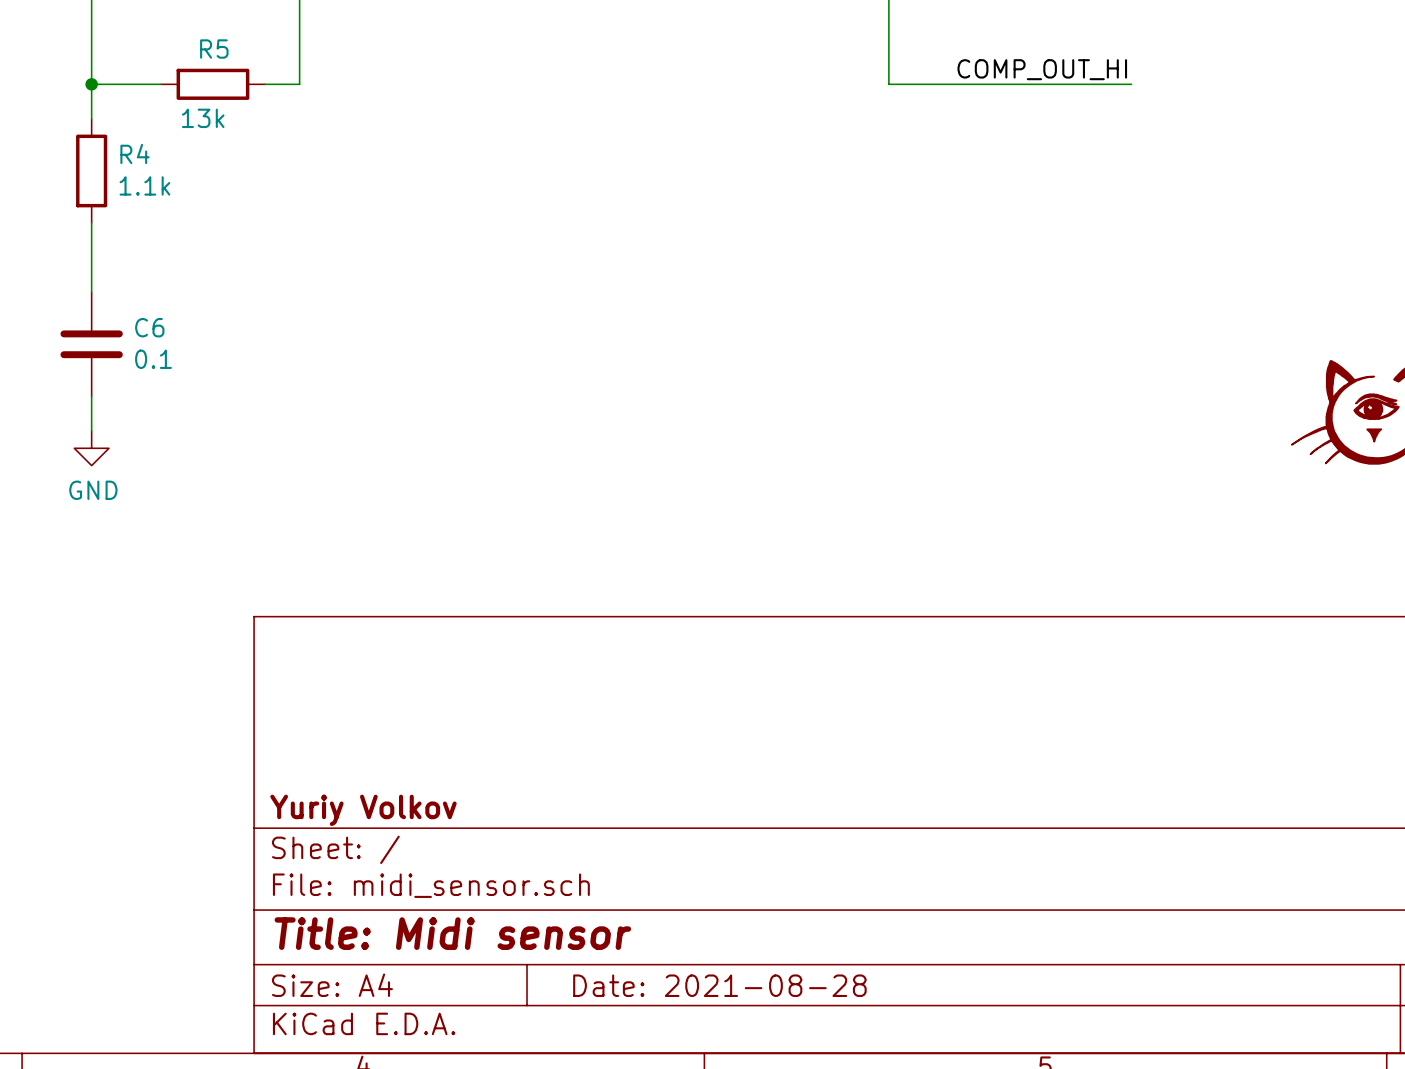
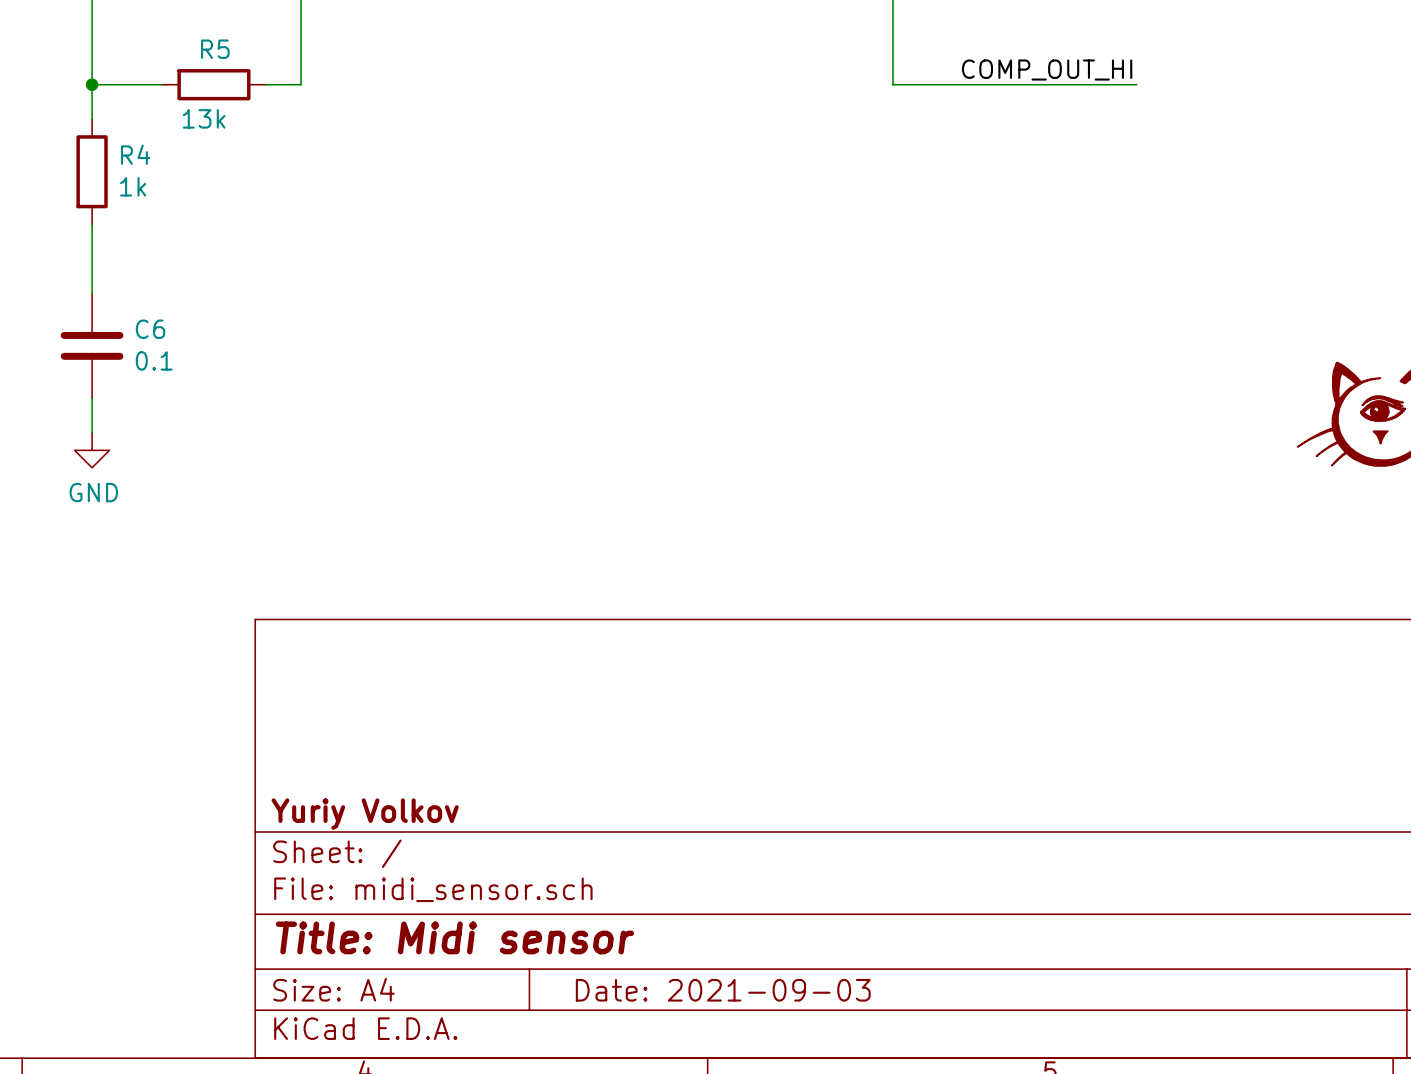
R4 value: 1.1k (144, 185) -> 1k (133, 186)
title block: Date: 2021-08-28 (719, 985) -> Date: 2021-09-03 (723, 990)

